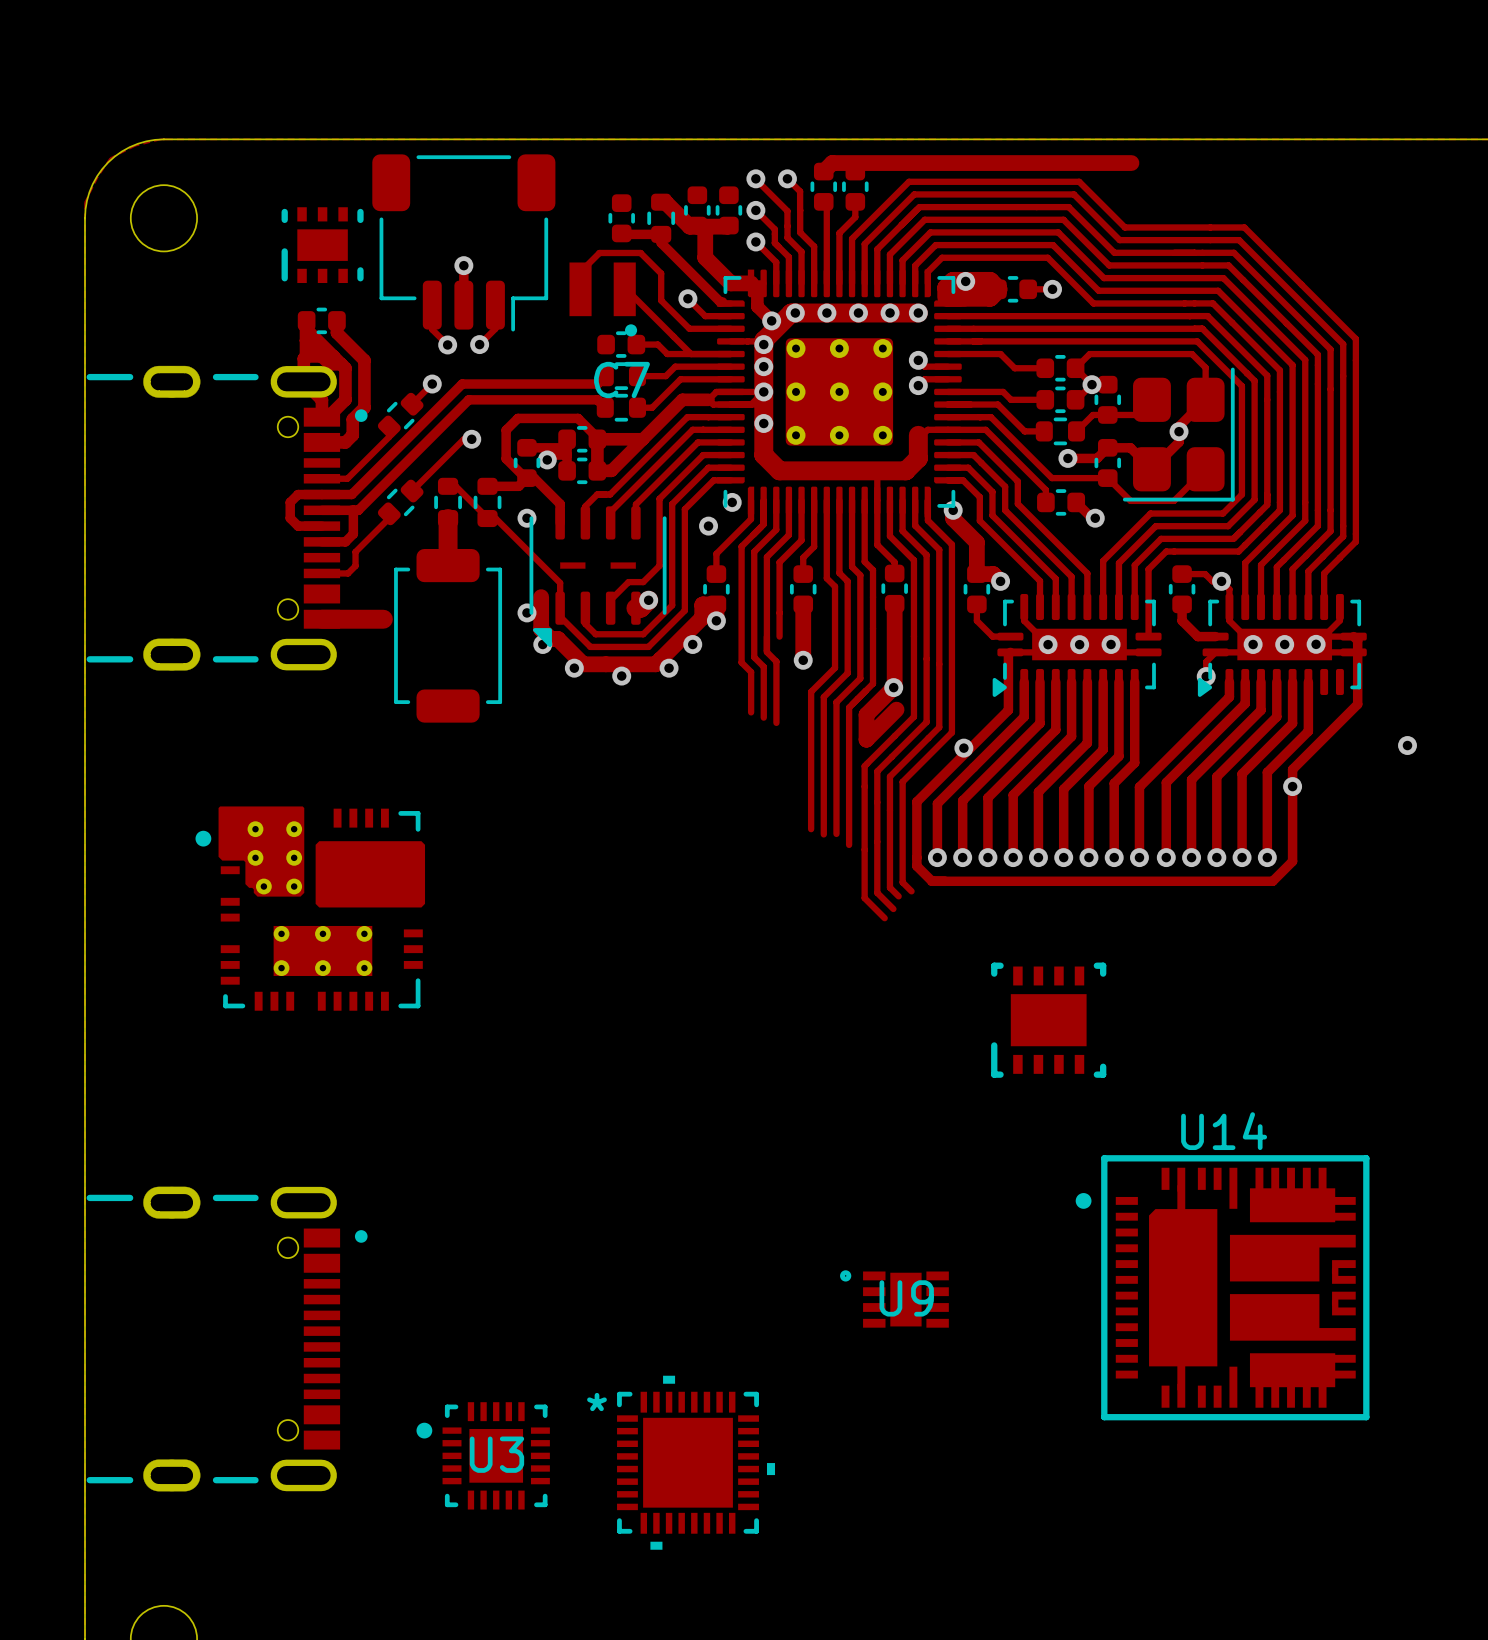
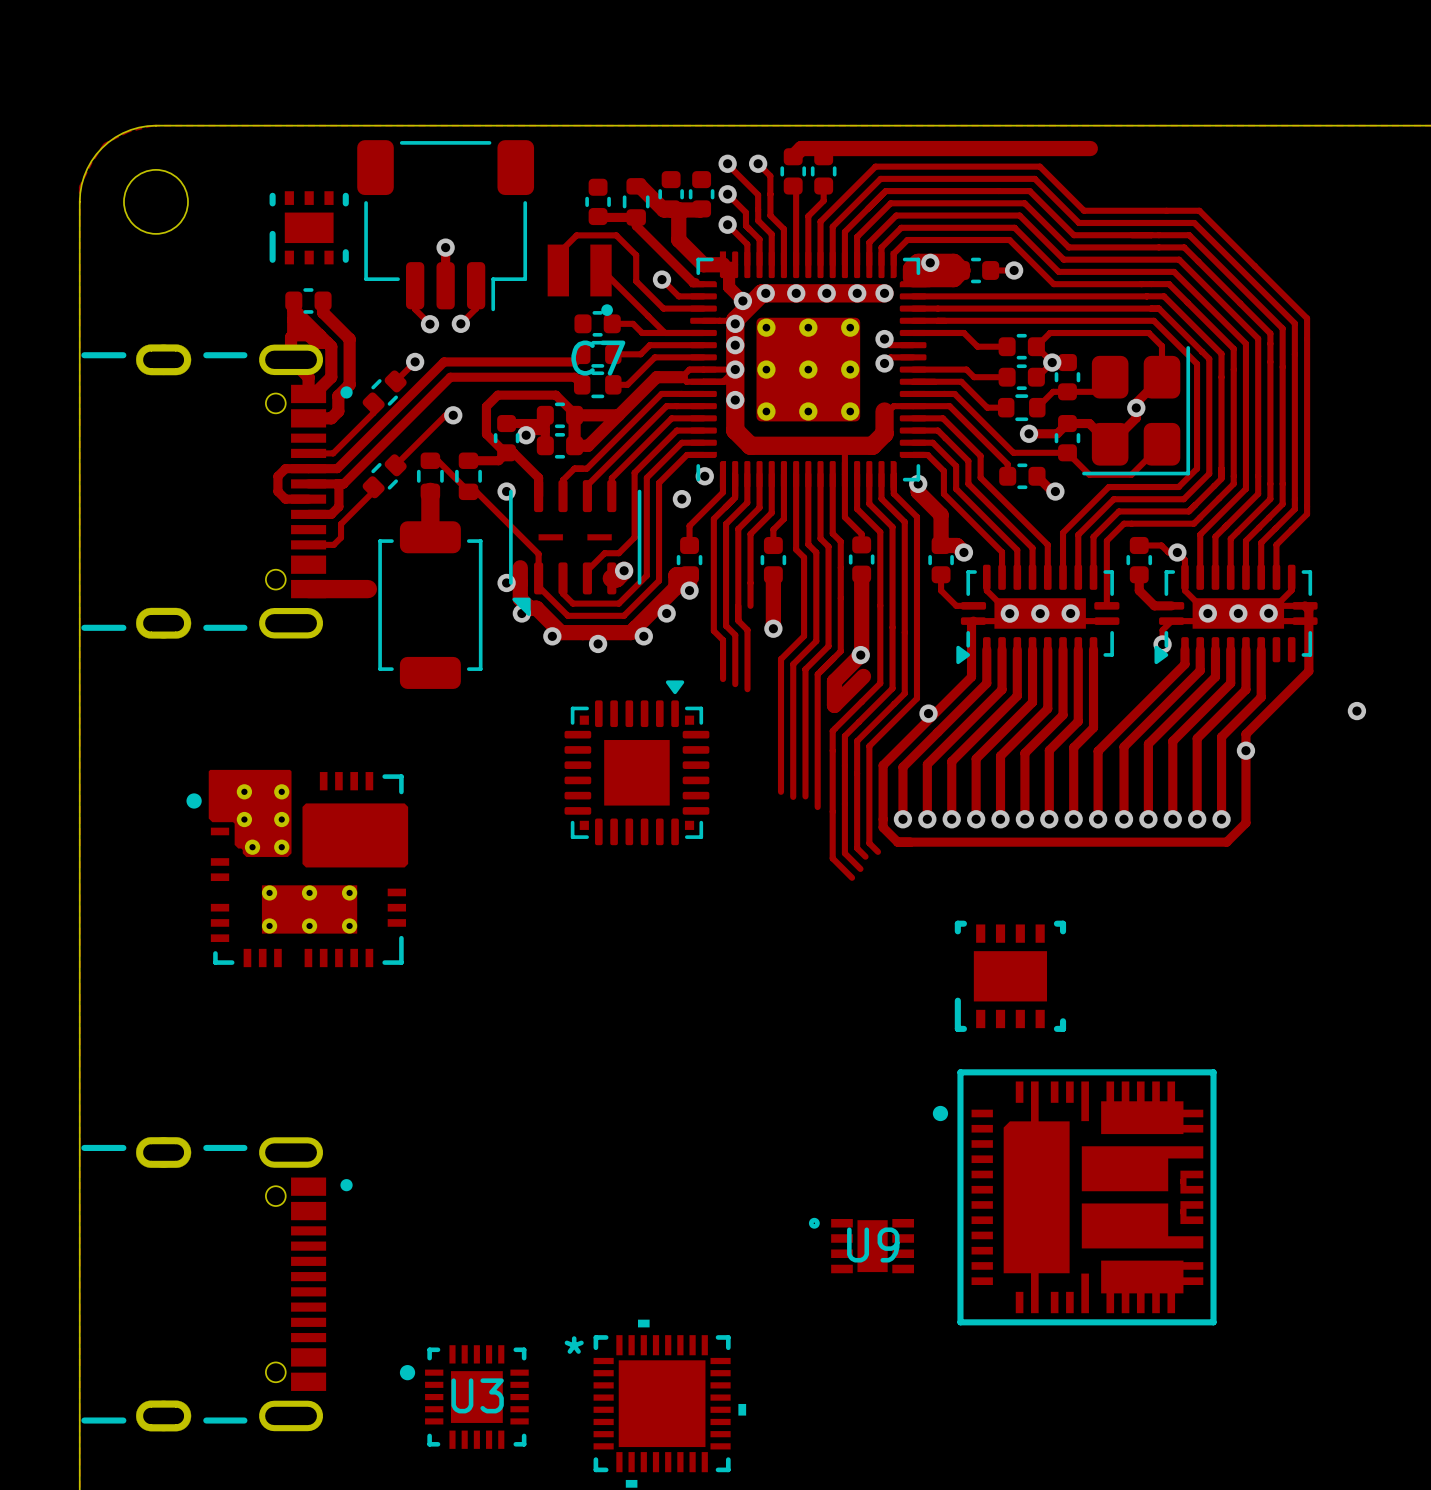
part: none -> (636, 762)
part: none -> (1074, 1197)
U14: (1222, 1287) -> none

